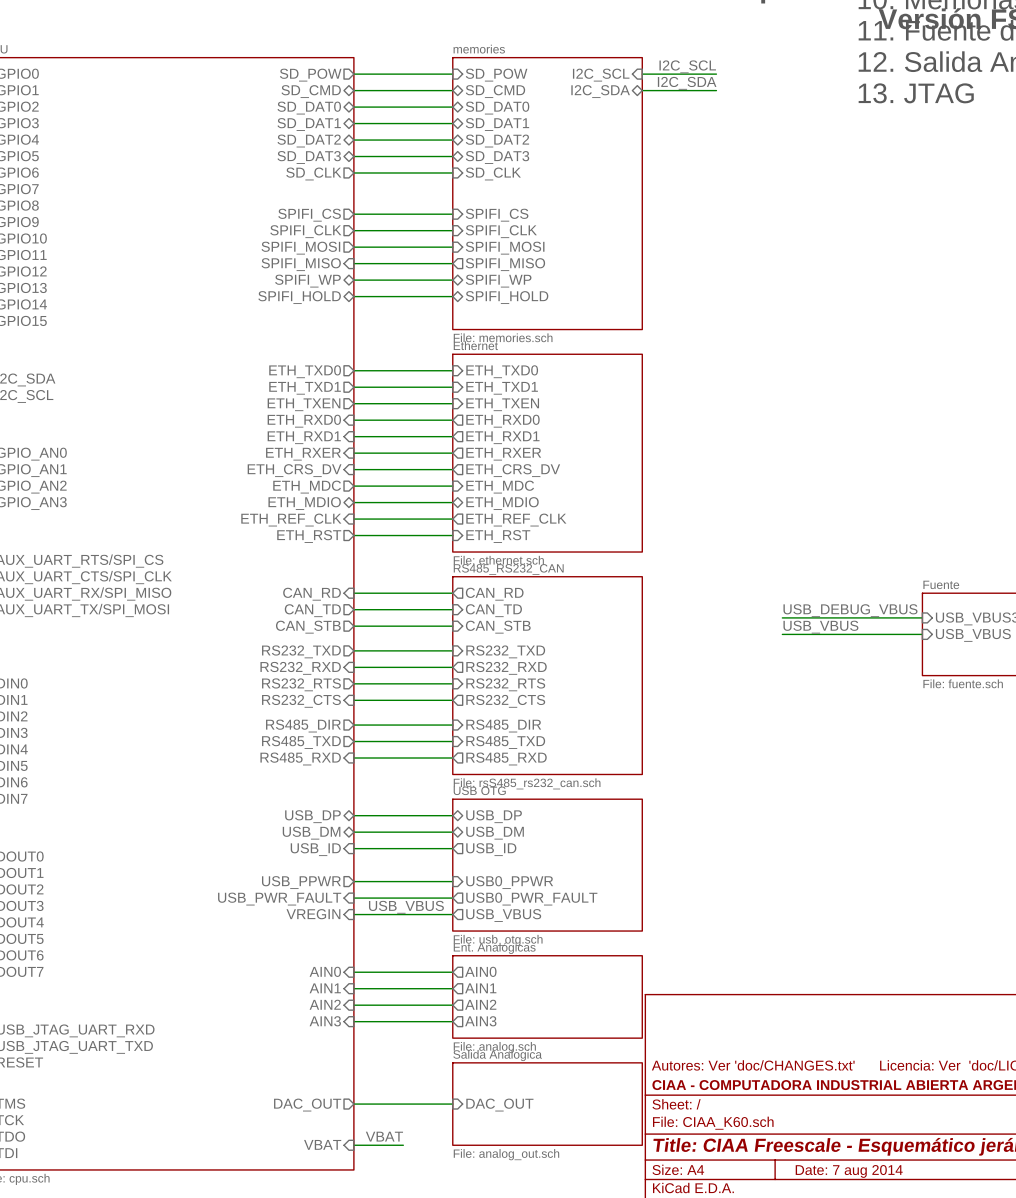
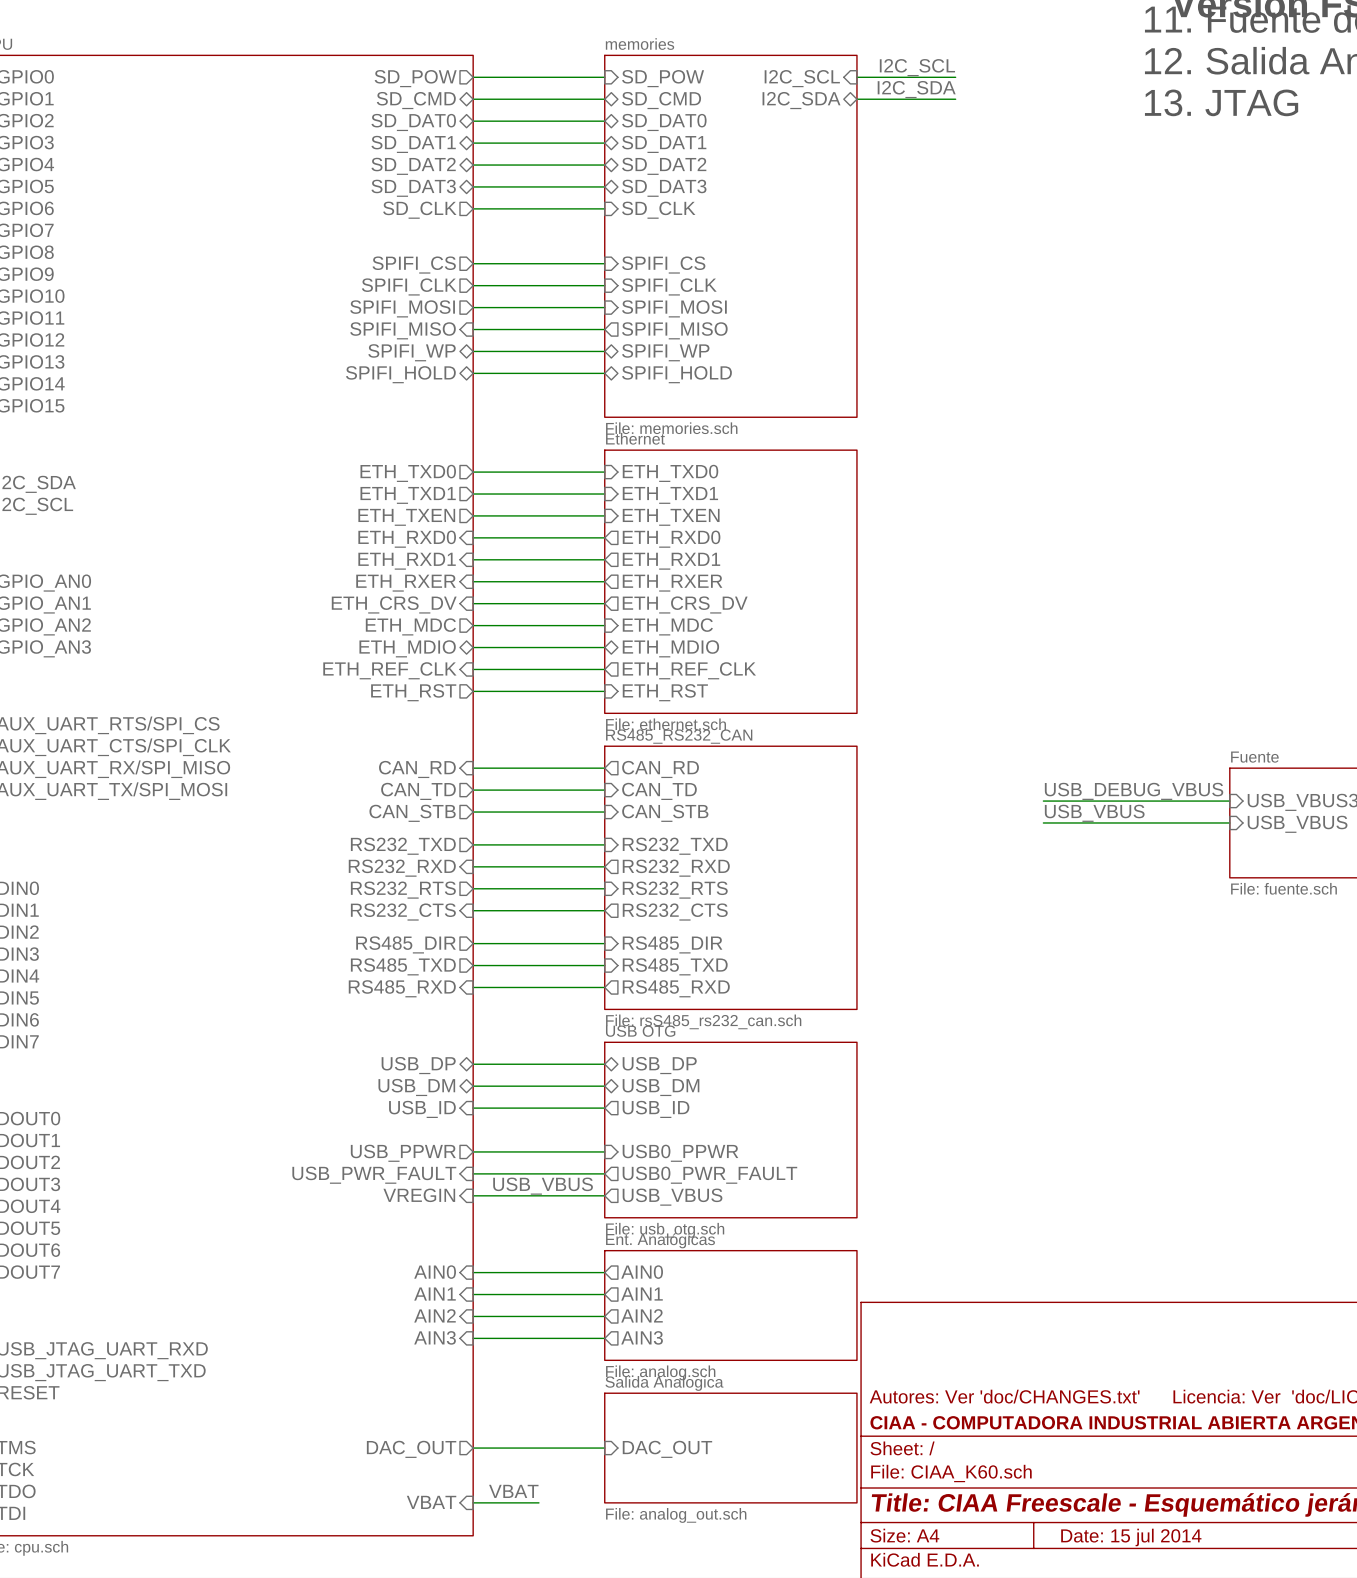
title block: Date: 7 aug 2014 (849, 1171) -> Date: 15 jul 2014 (1131, 1537)

